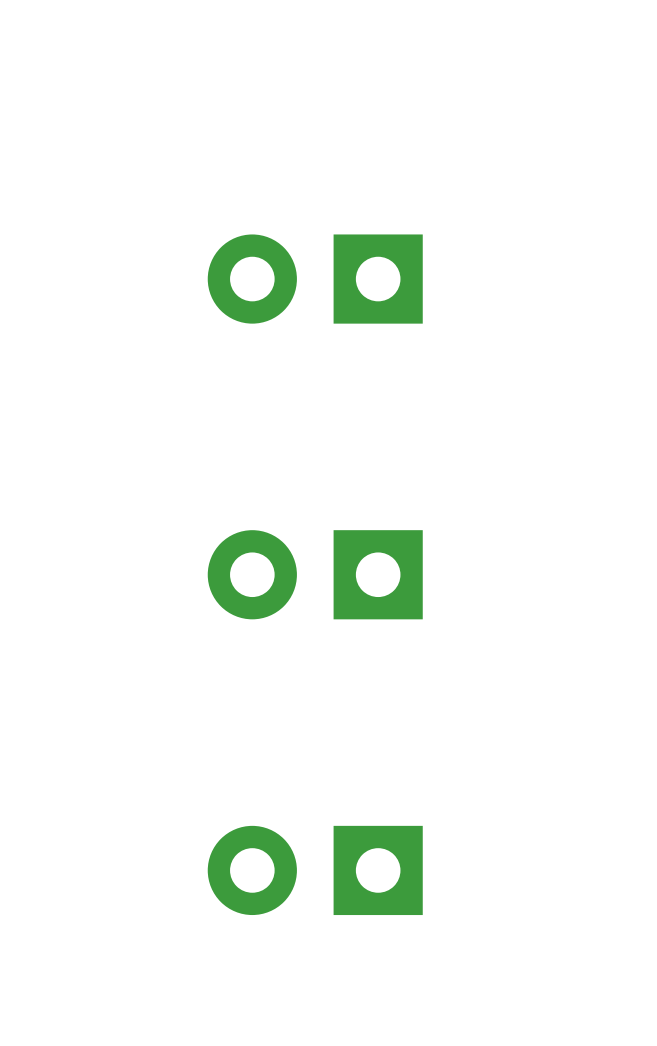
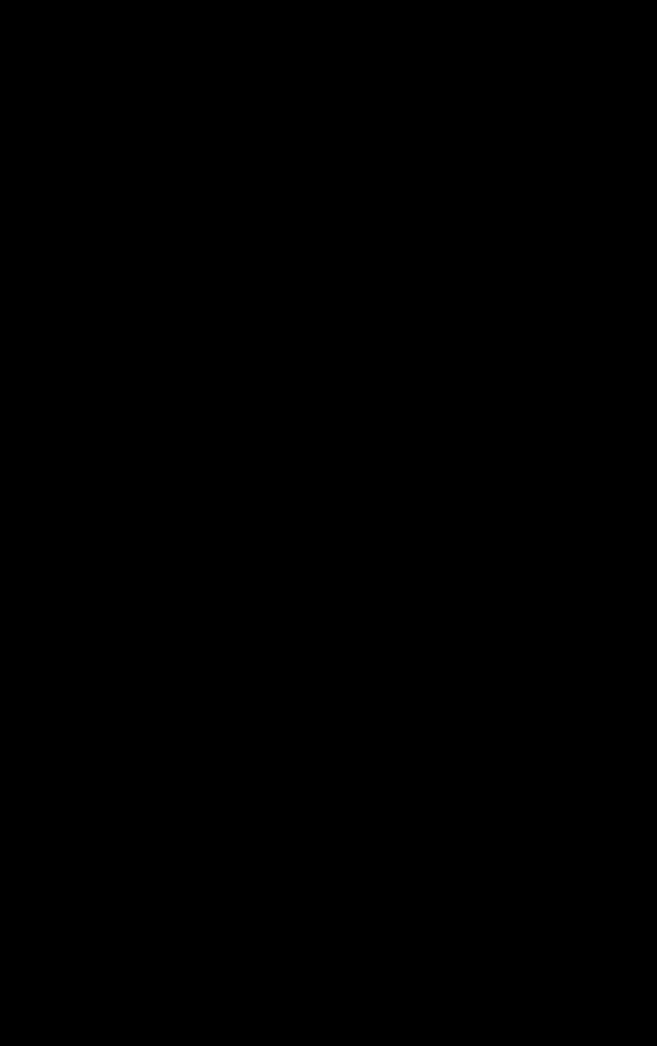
part: (315, 279) -> none
part: (315, 574) -> none
part: (315, 870) -> none

